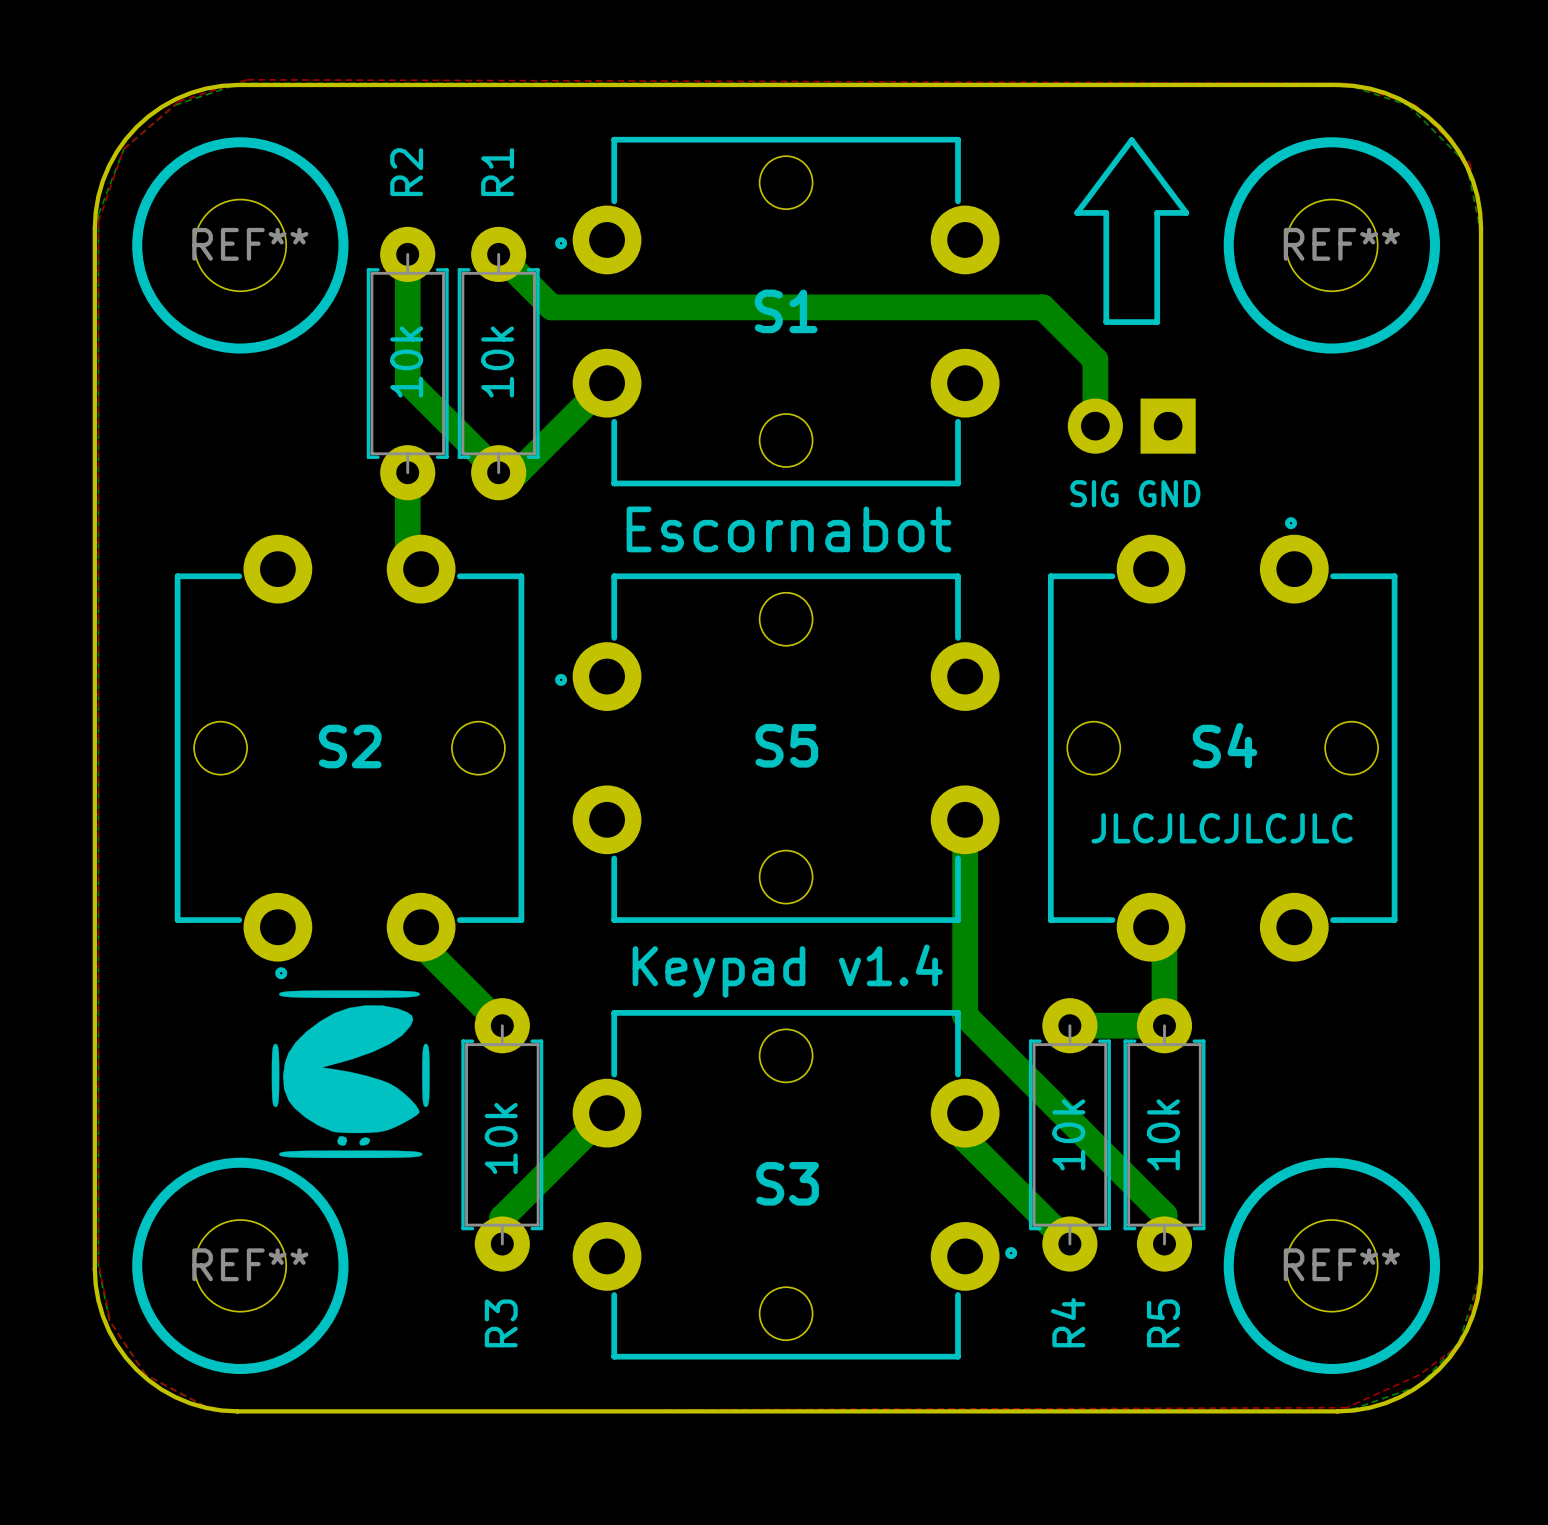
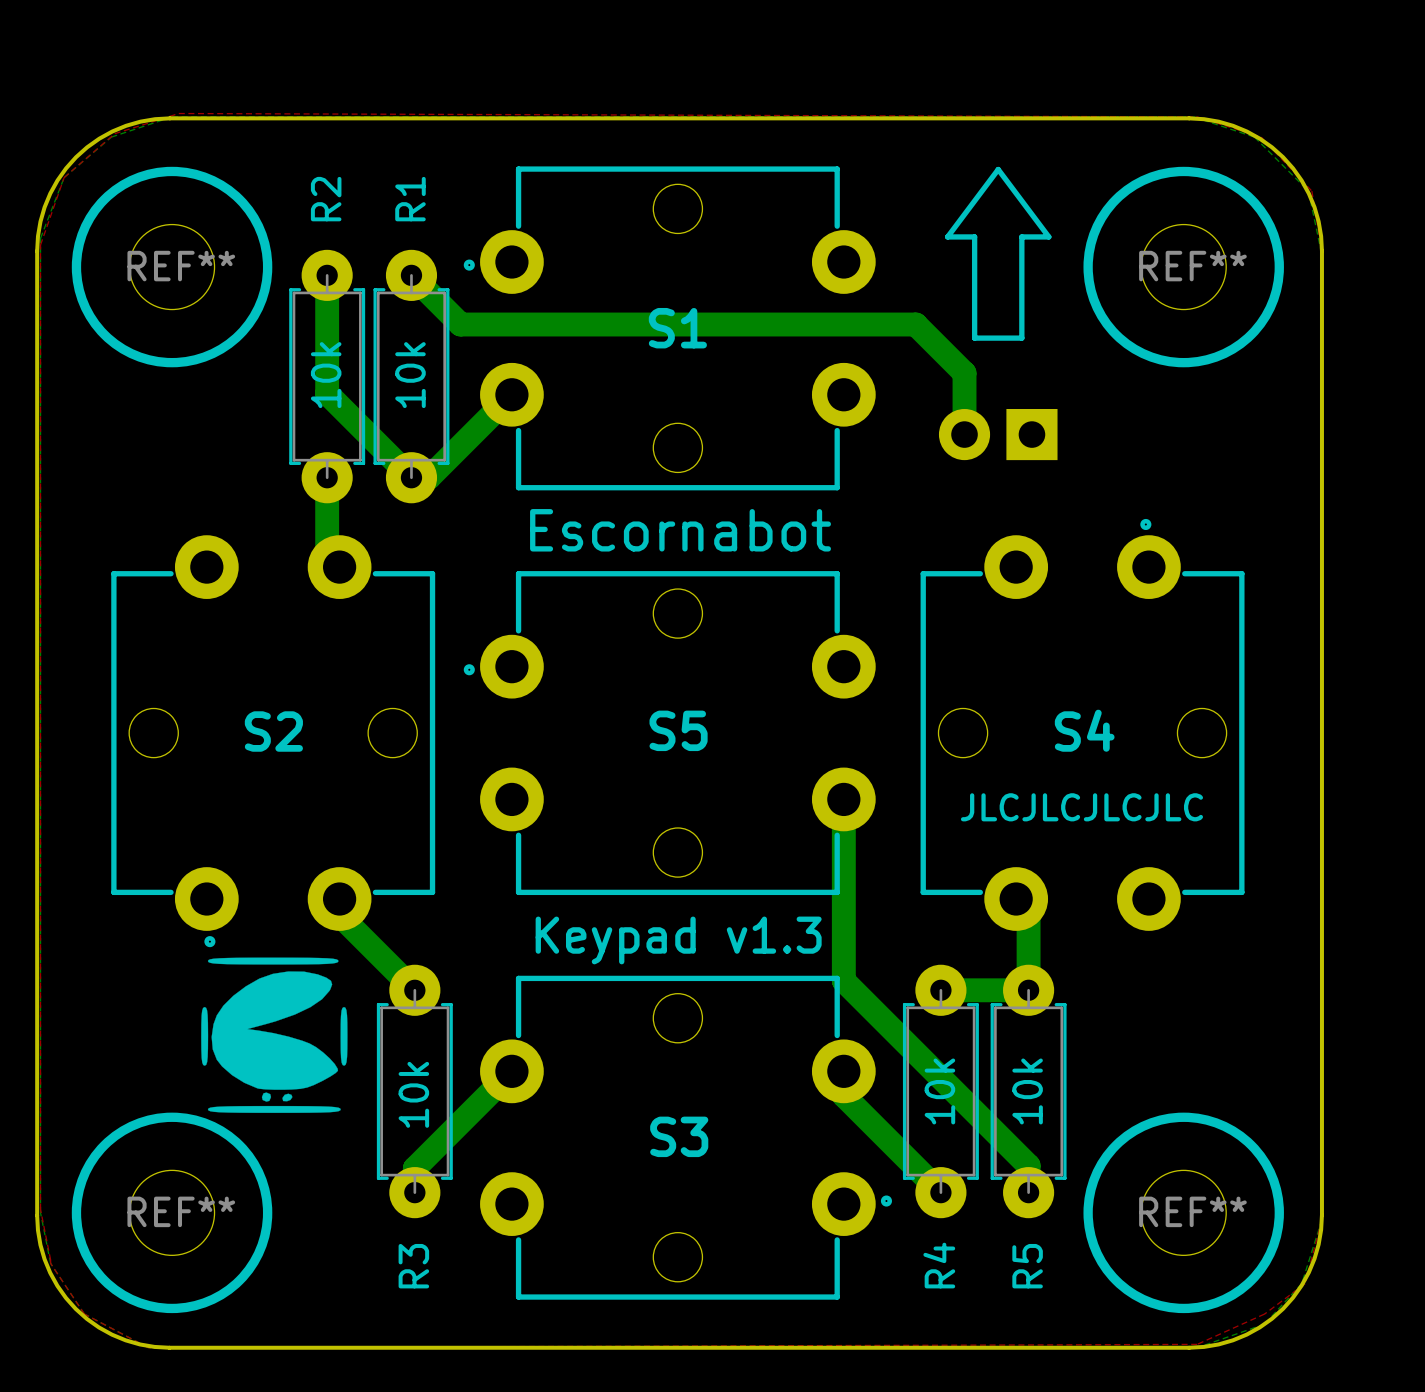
text: SIG GND (1135, 493) -> none
text: Keypad v1.4 (787, 971) -> Keypad v1.3 (678, 940)

